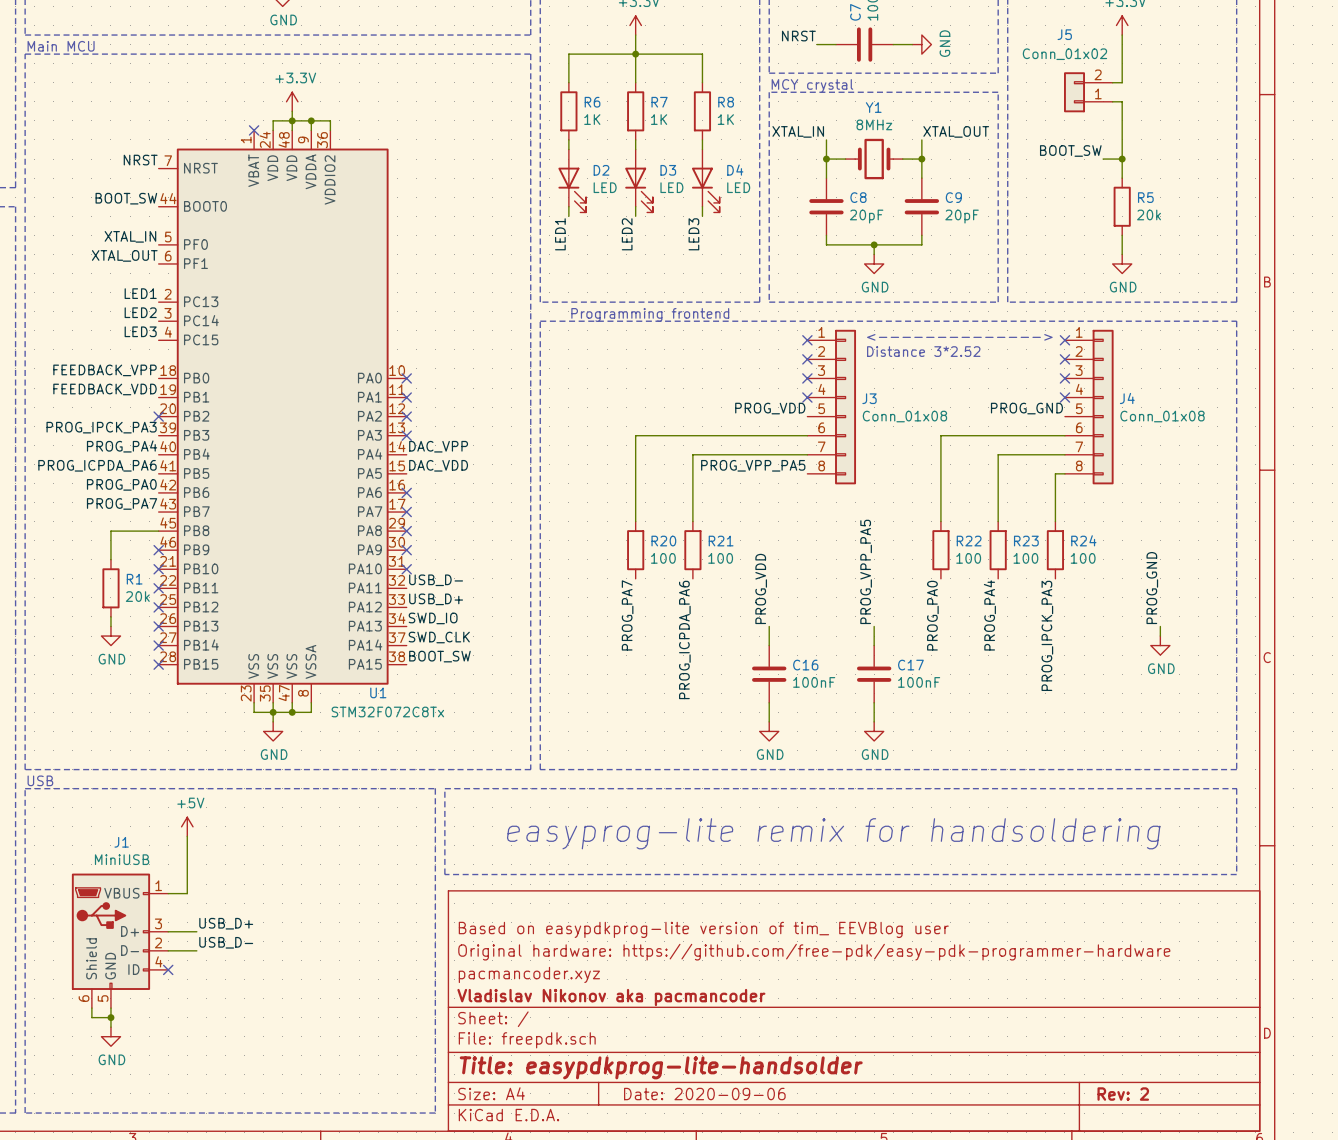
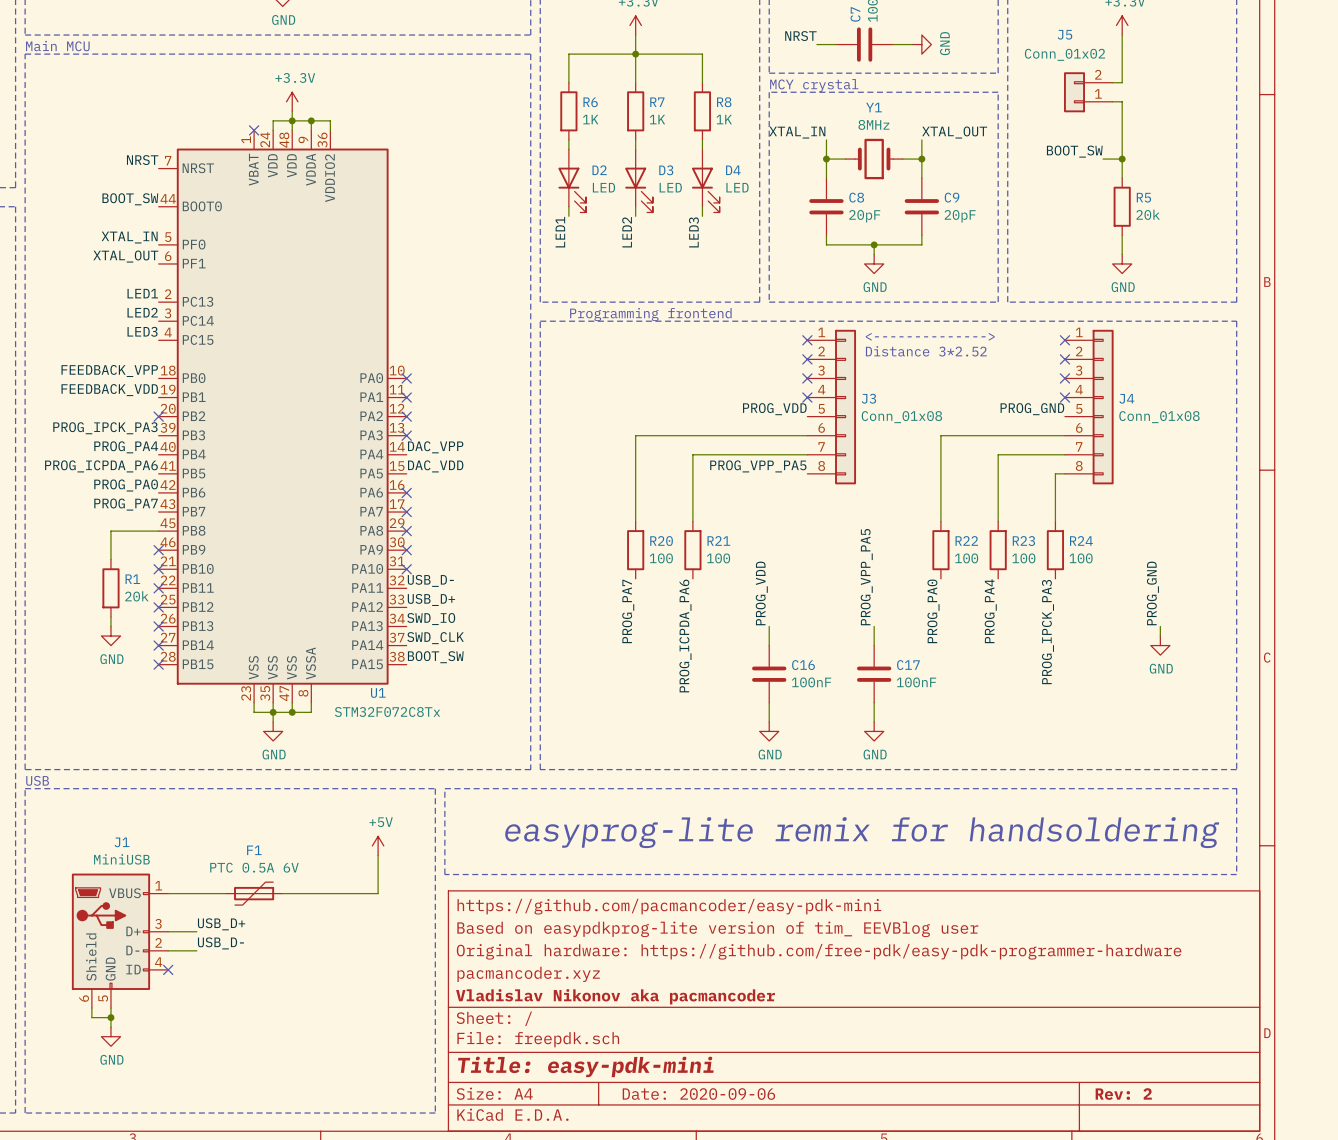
power symbol: +5V (187, 826) -> none
wire: (187, 836) (187, 893) -> (225, 893) (187, 893)
power symbol: none -> +5V (378, 845)
wire: none -> (378, 855) (378, 893) (282, 893)
F1: none -> PTC 0.5A 6V (254, 893)
title block: none -> https://github.com/pacmancoder/easy-pdk-mini (669, 906)
title block: Title: easypdkprog-lite-handsolder (661, 1067) -> Title: easy-pdk-mini (585, 1066)

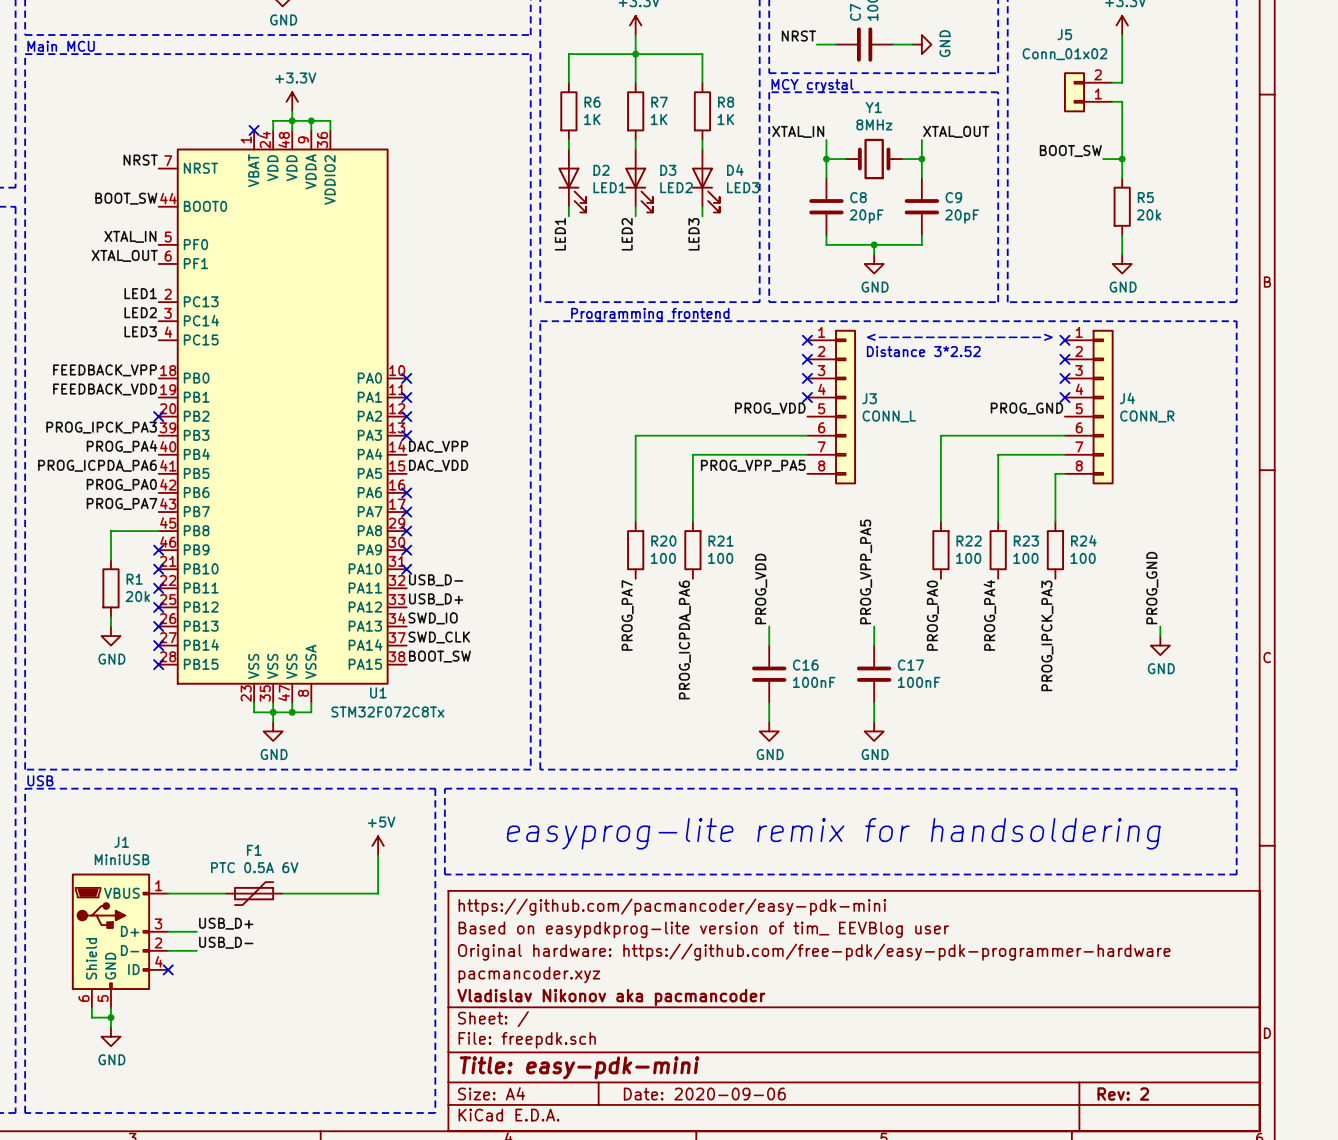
D2 value: LED (603, 187) -> LED1 (609, 187)
D3 value: LED (670, 187) -> LED2 (676, 187)
D4 value: LED (737, 187) -> LED3 (743, 187)
J3 value: Conn_01x08 (901, 417) -> CONN_L (889, 416)
J4 value: Conn_01x08 (1159, 417) -> CONN_R (1147, 416)

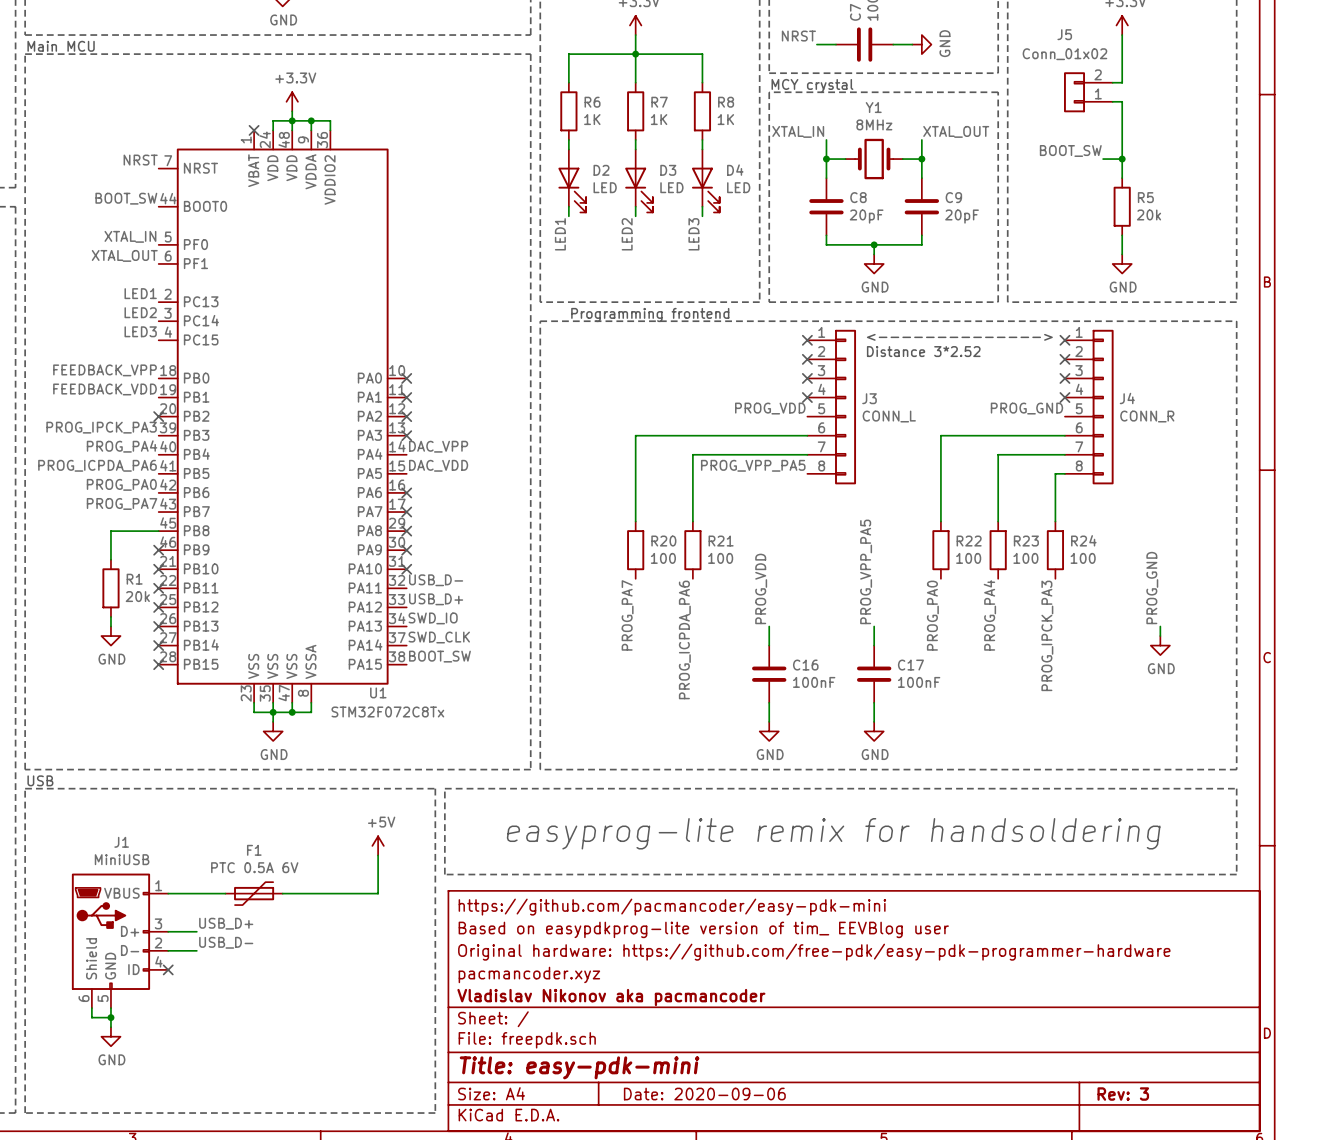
D2 value: LED1 (609, 187) -> LED (605, 187)
D3 value: LED2 (676, 187) -> LED (671, 187)
D4 value: LED3 (743, 187) -> LED (738, 187)
title block: Rev: 2 (1123, 1094) -> Rev: 3 (1123, 1094)

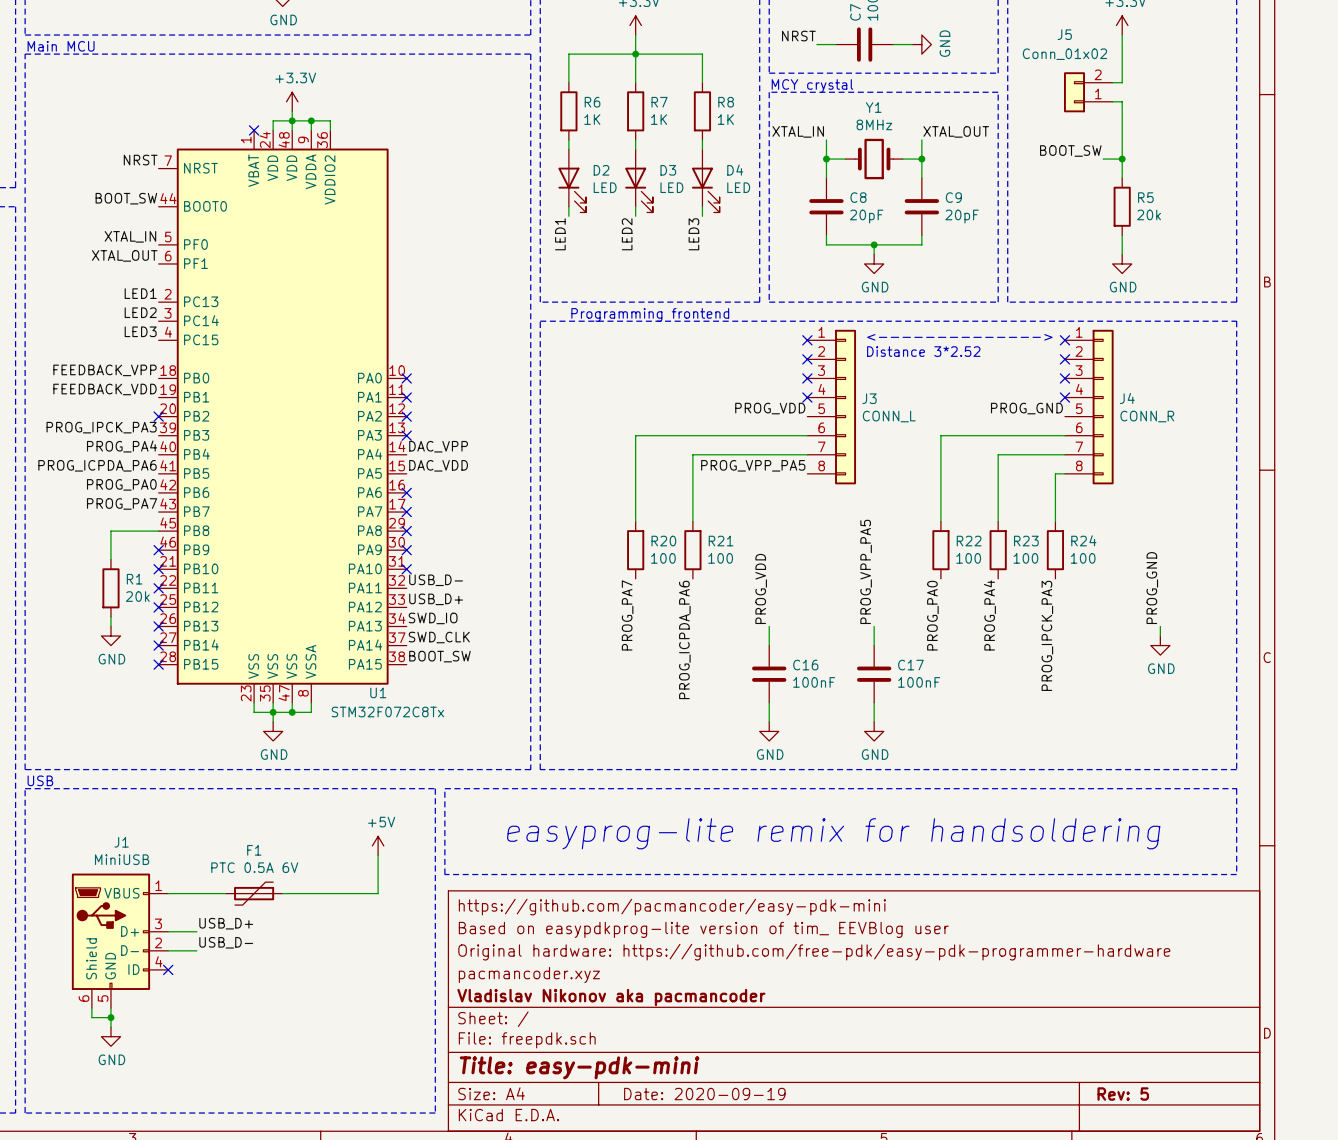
title block: Date: 2020-09-06 (704, 1094) -> Date: 2020-09-19 (704, 1094)
title block: Rev: 3 (1123, 1094) -> Rev: 5 (1123, 1094)

